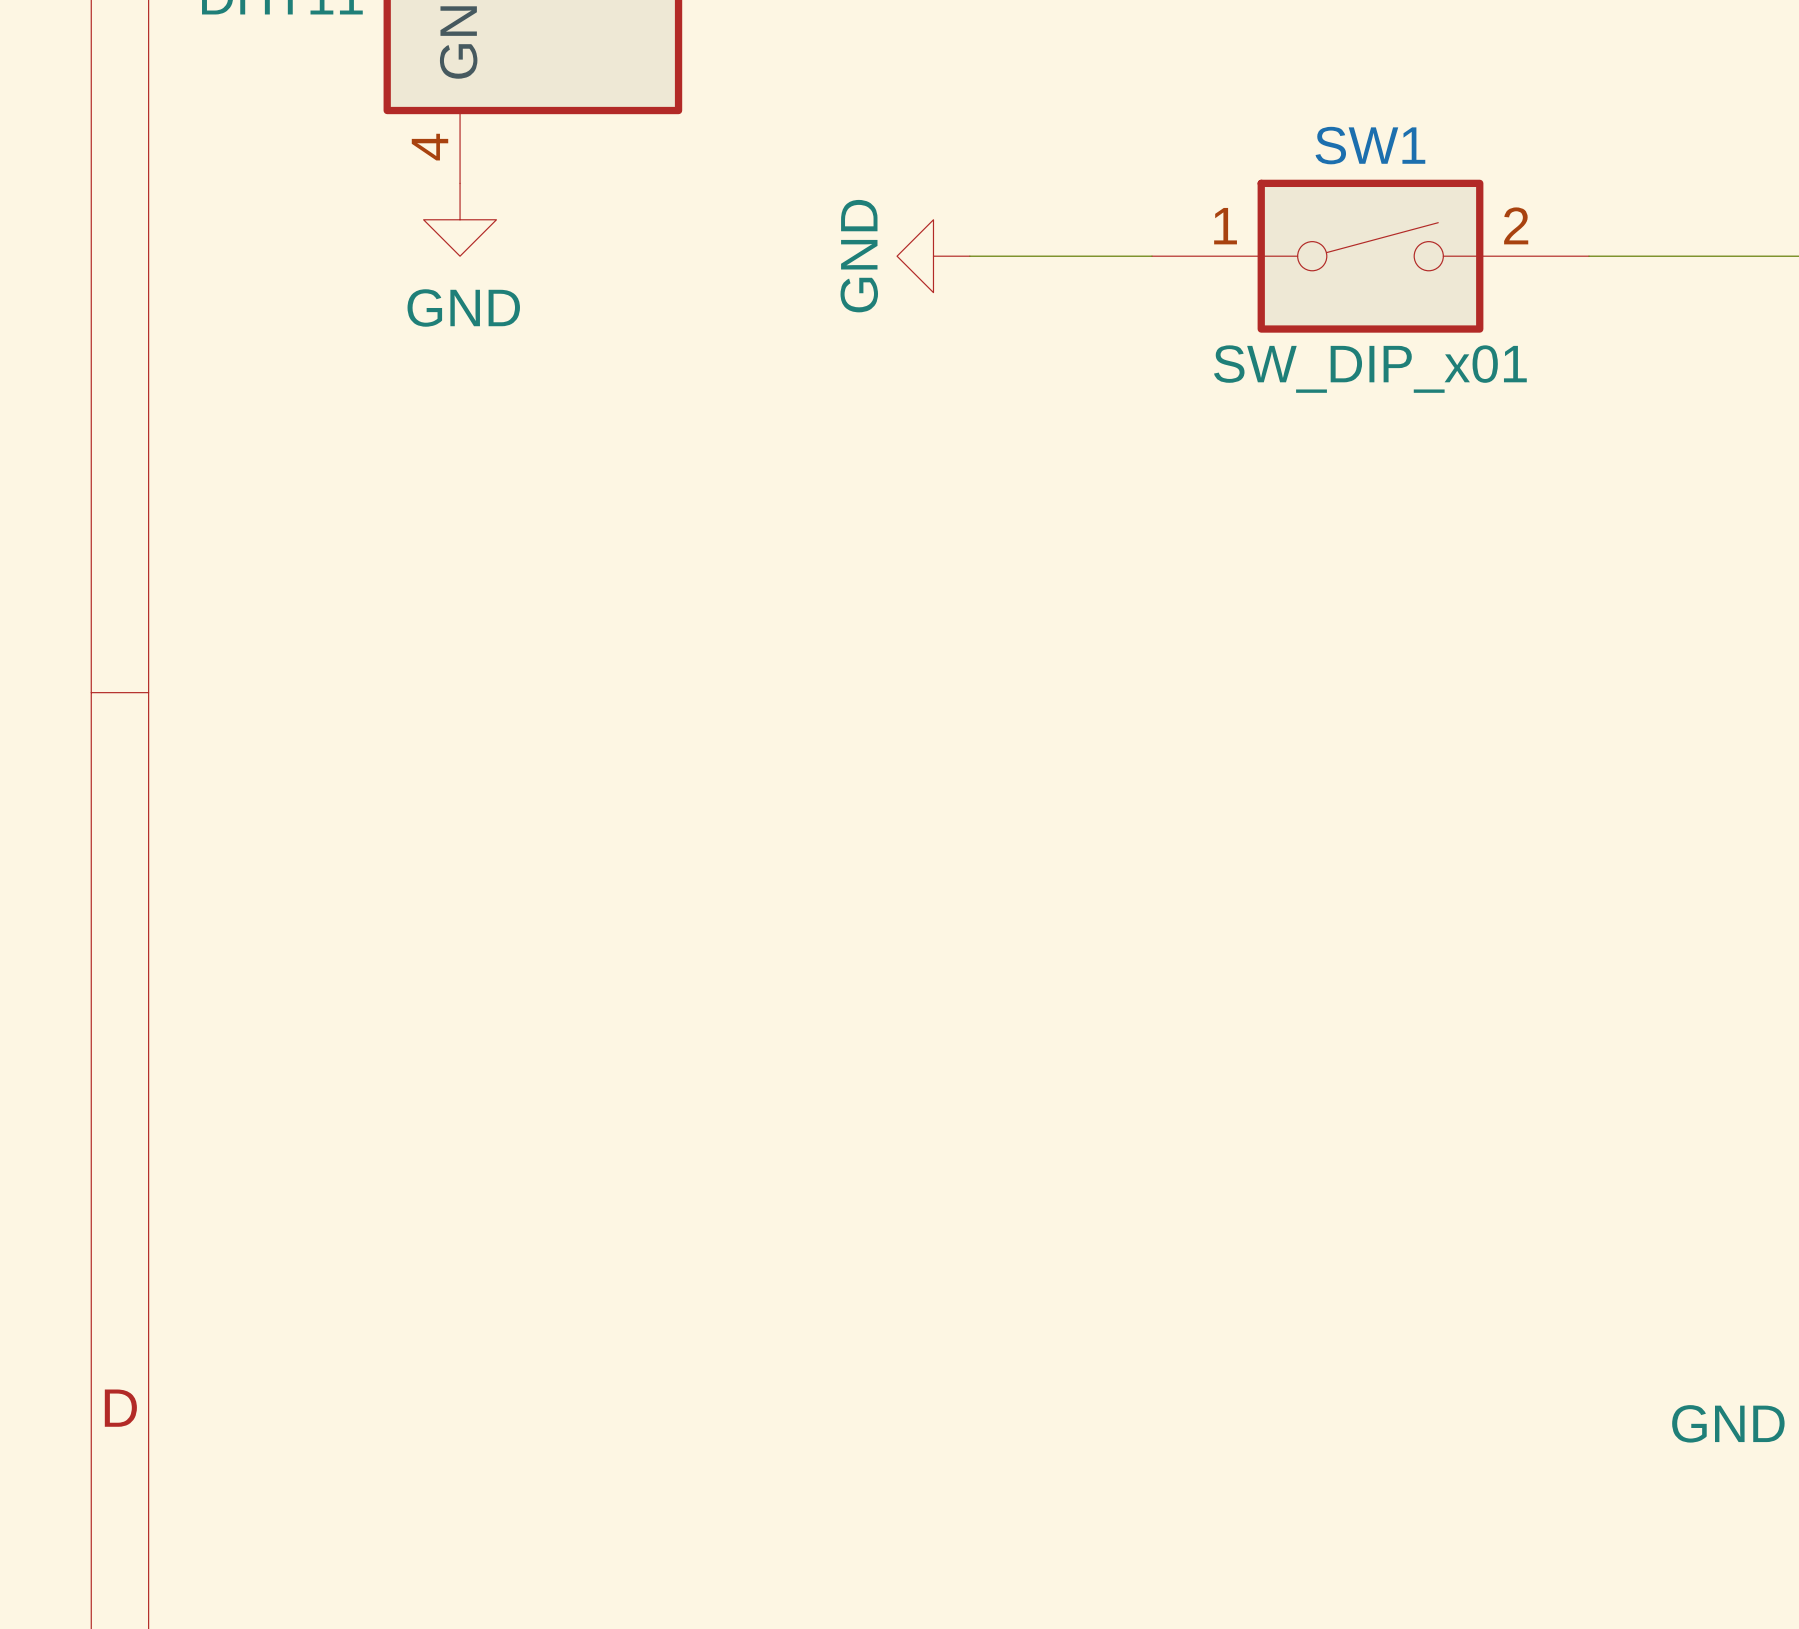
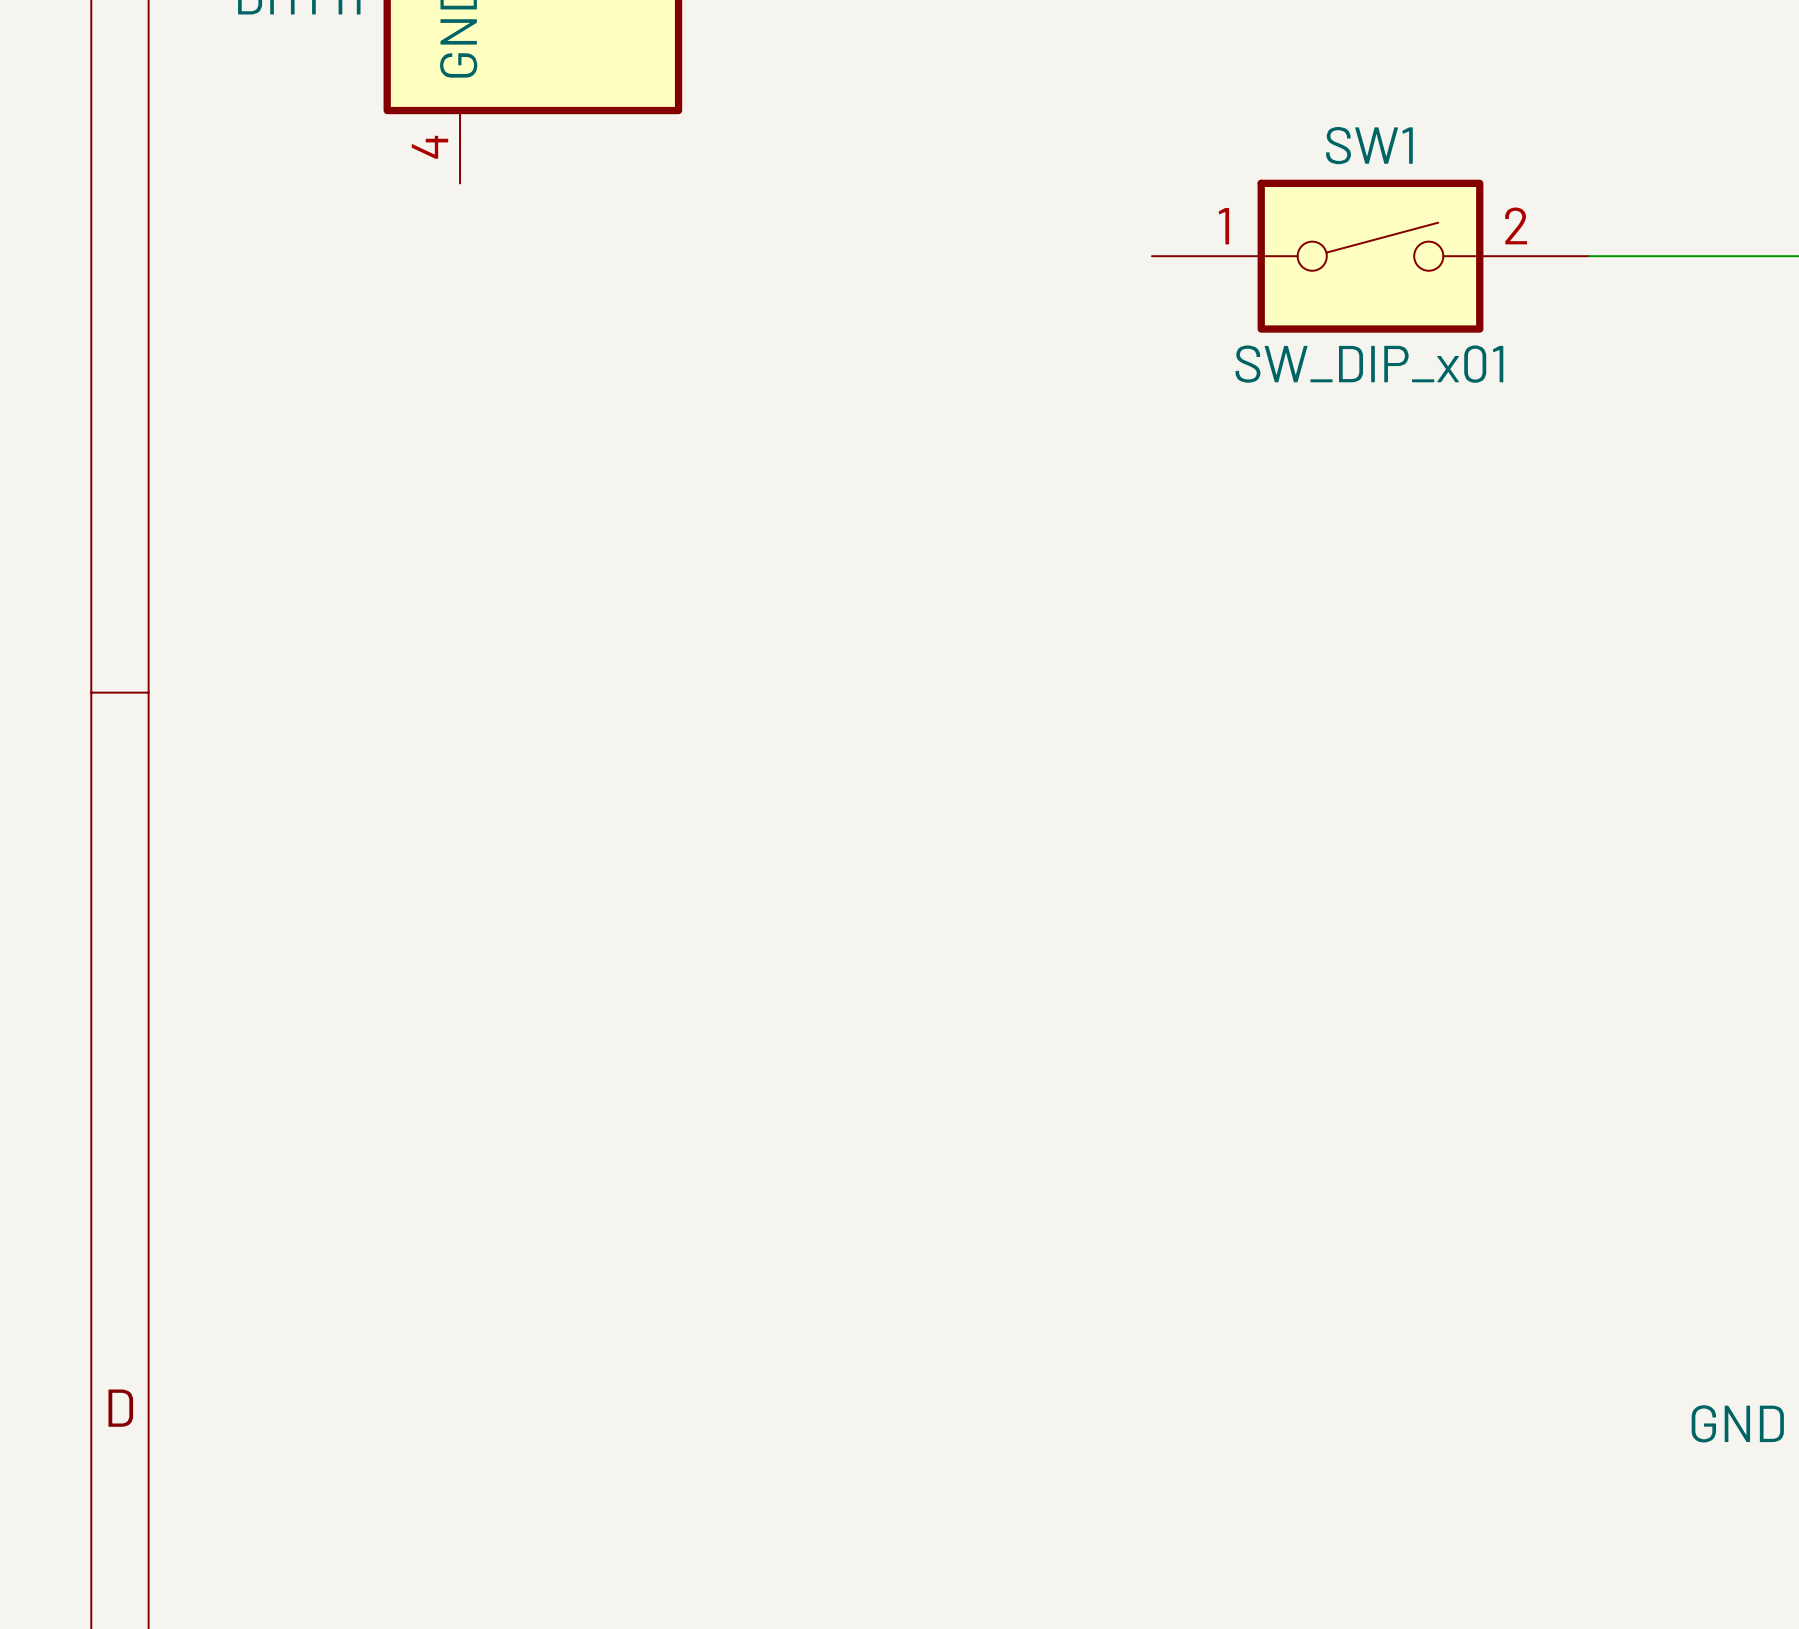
power symbol: GND (460, 219) -> none
power symbol: GND (933, 256) -> none
wire: (969, 256) (1151, 256) -> none

